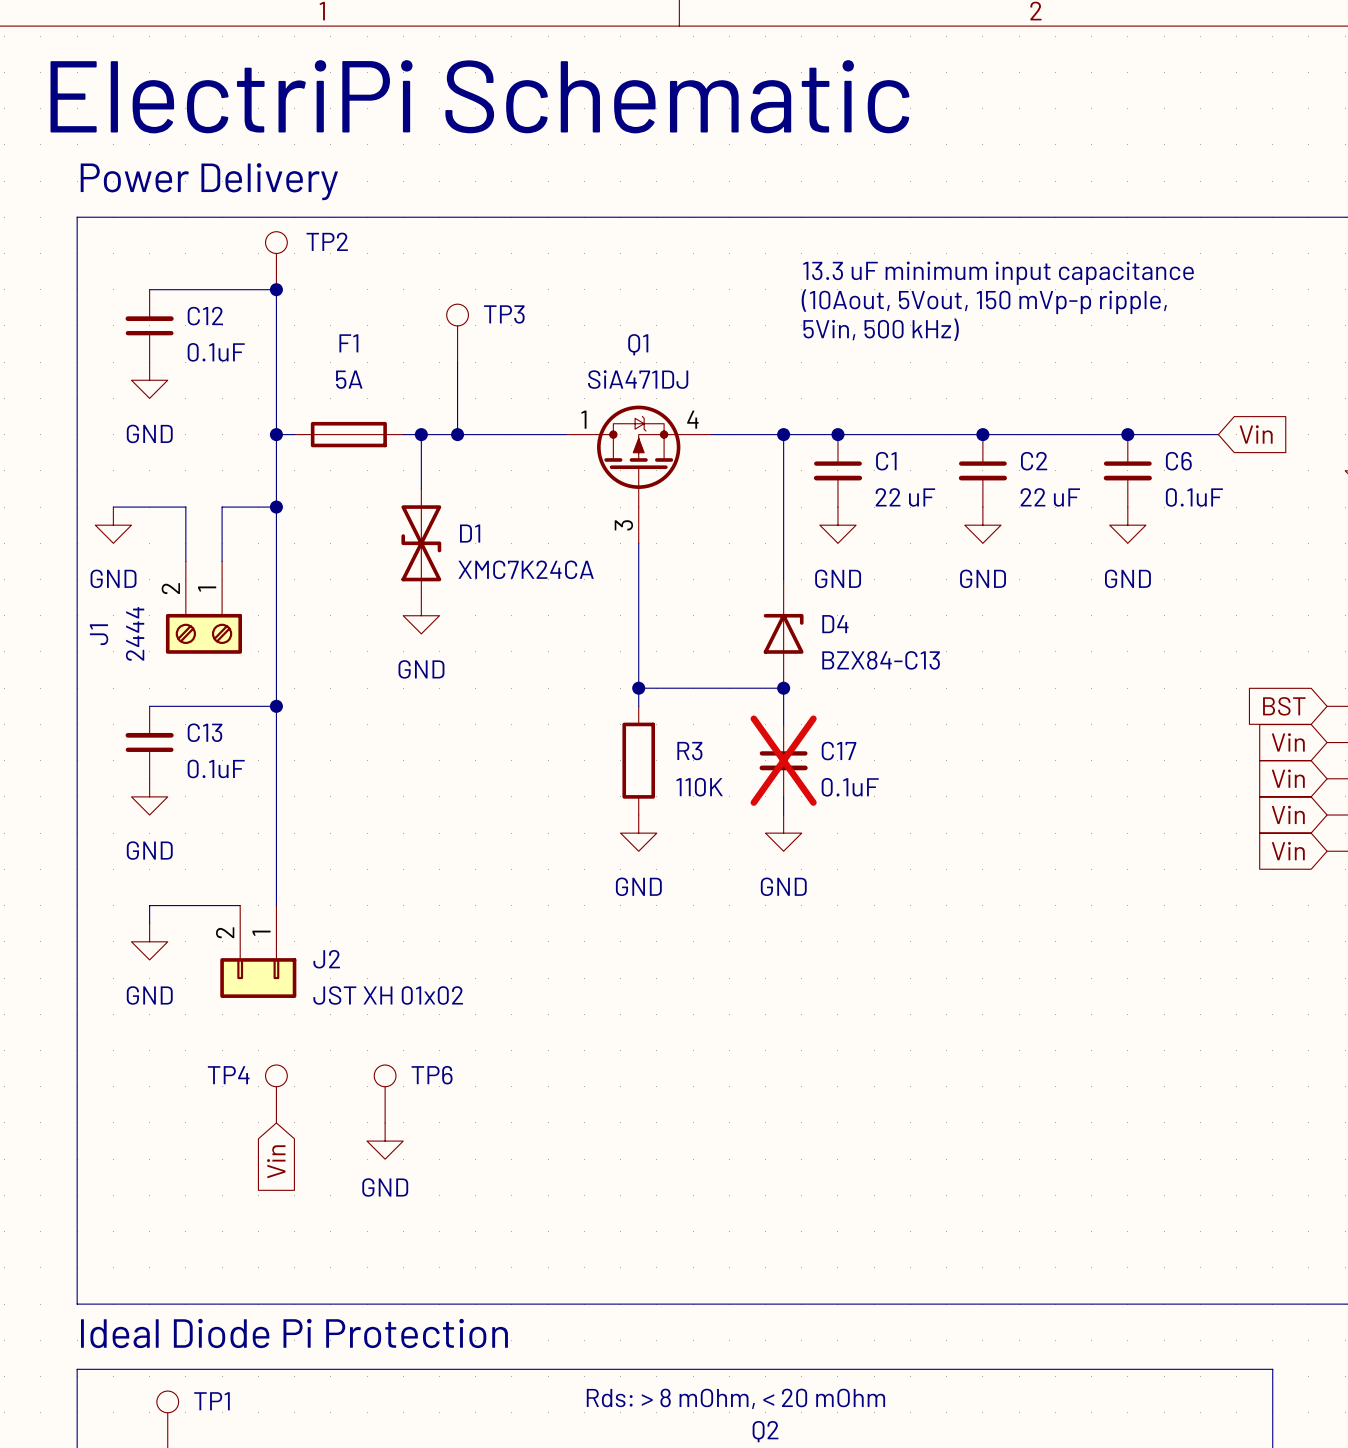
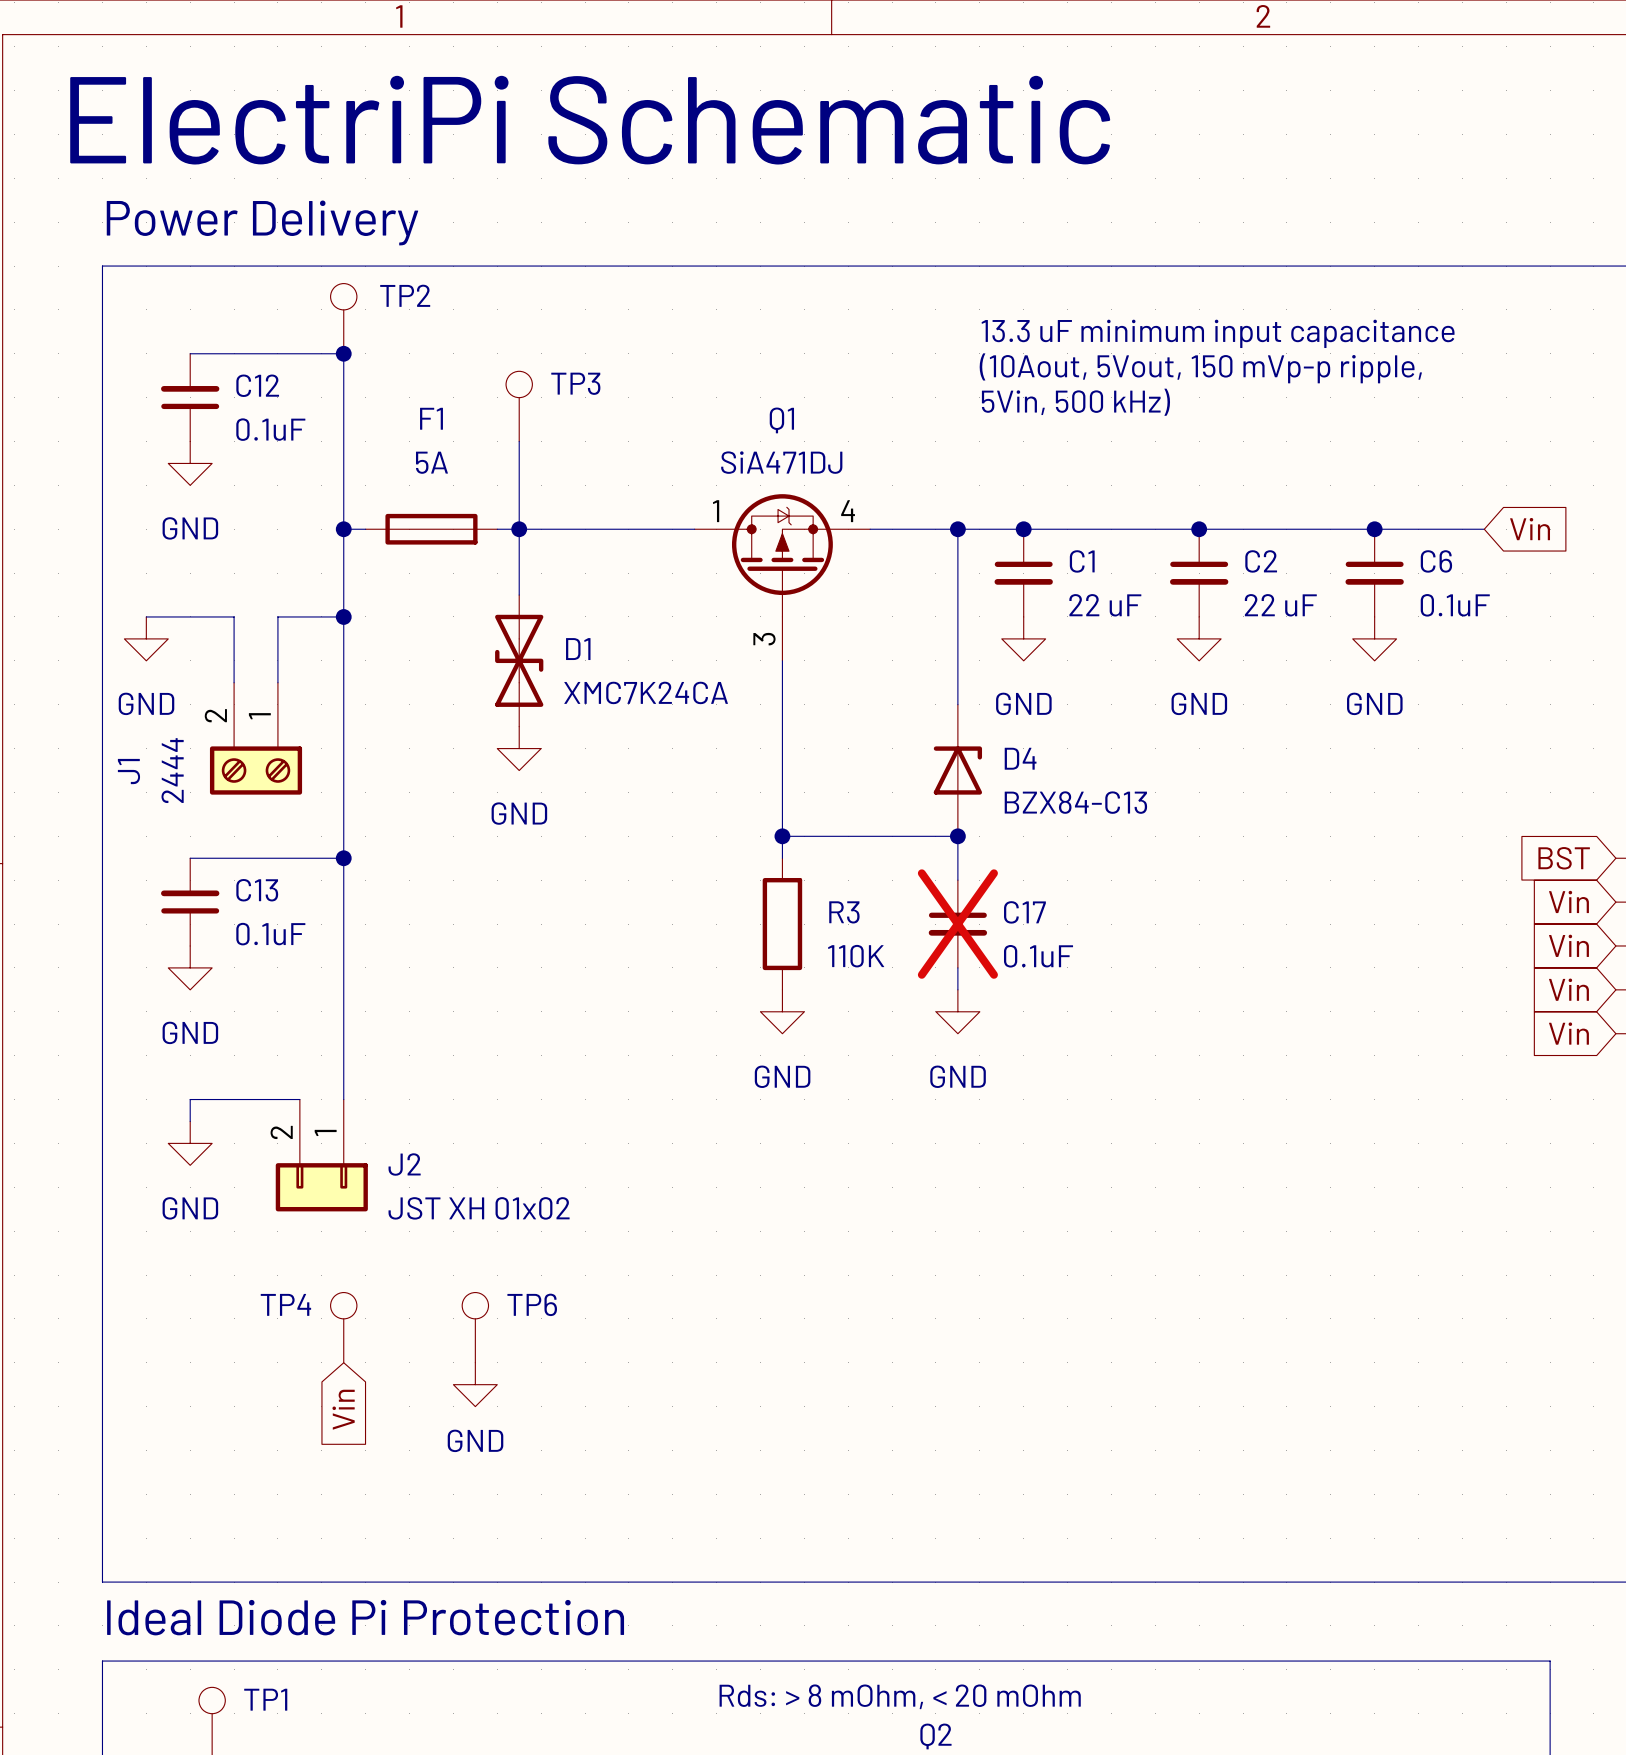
TP3 position: (457, 333) -> (519, 406)
wire: (457, 362) (457, 434) -> (519, 441) (519, 529)
junction: (457, 434) -> none

